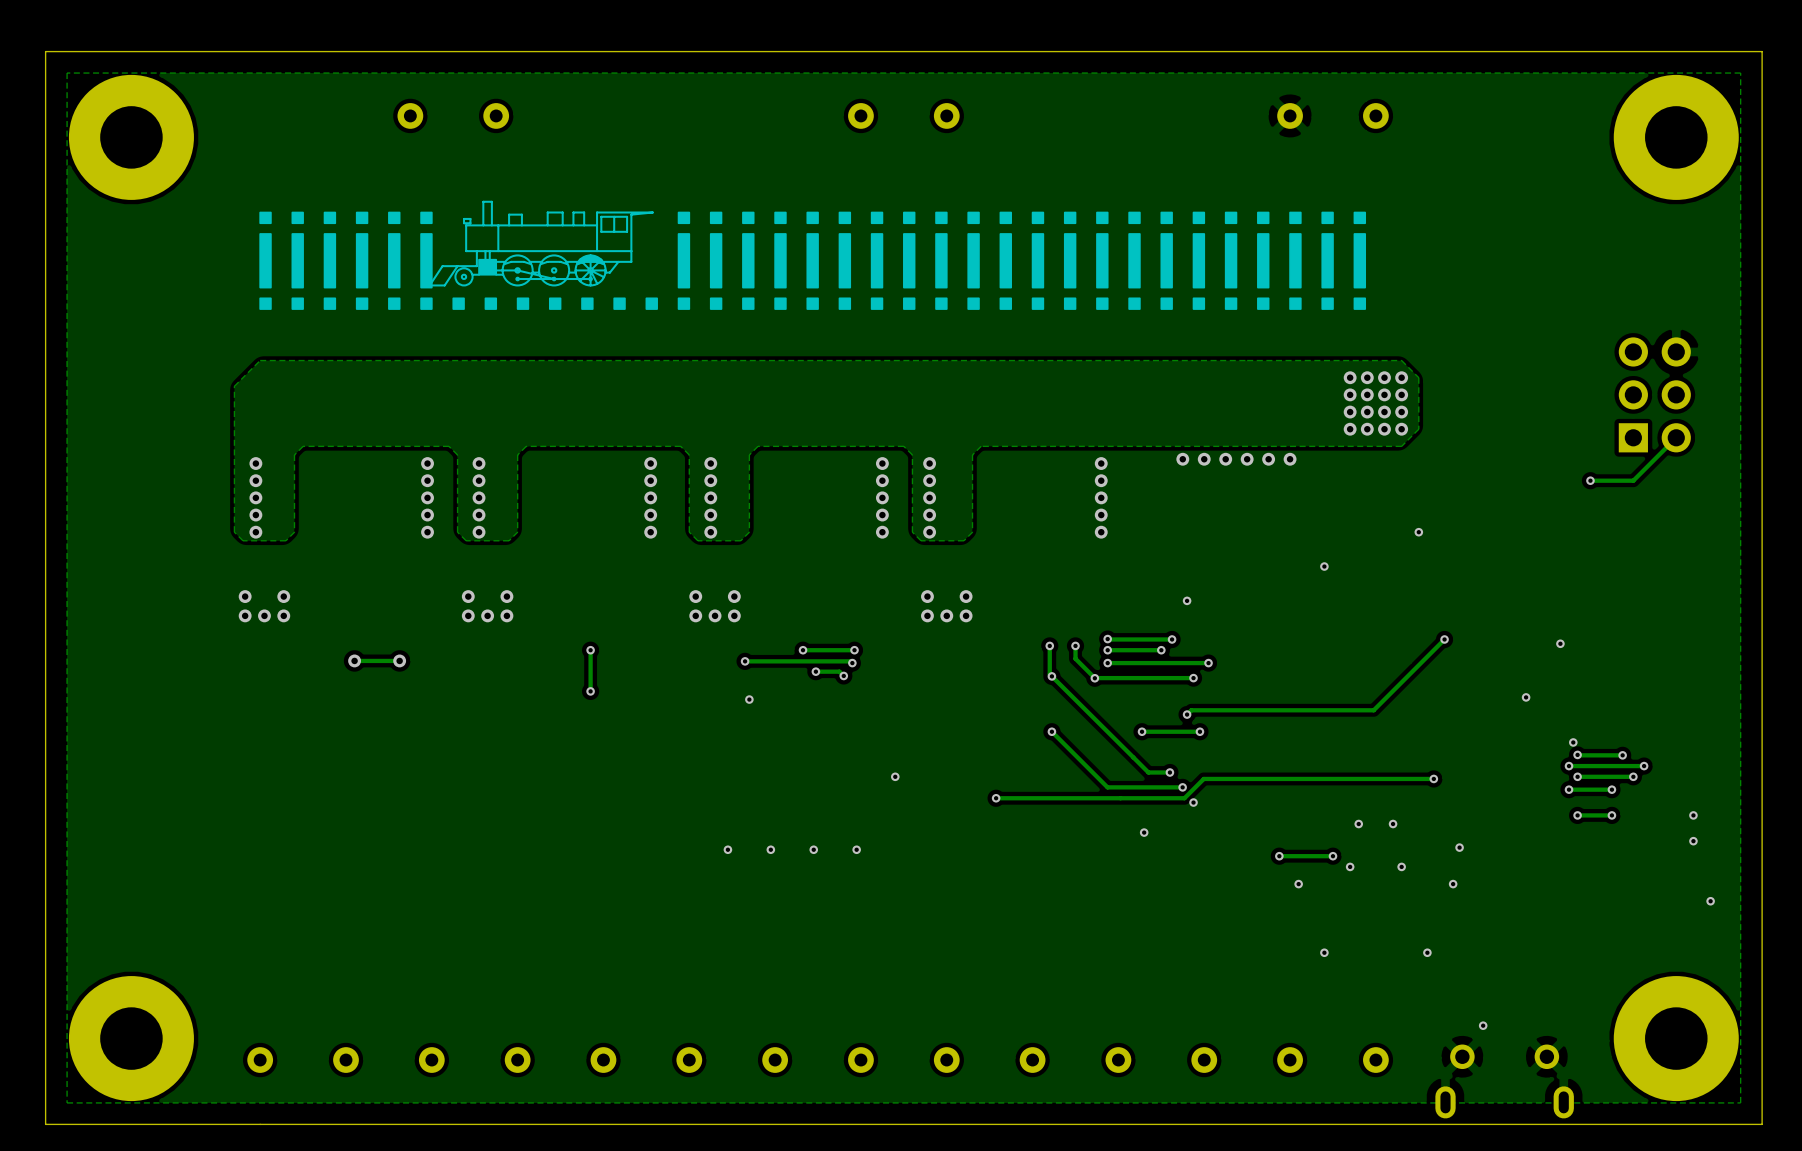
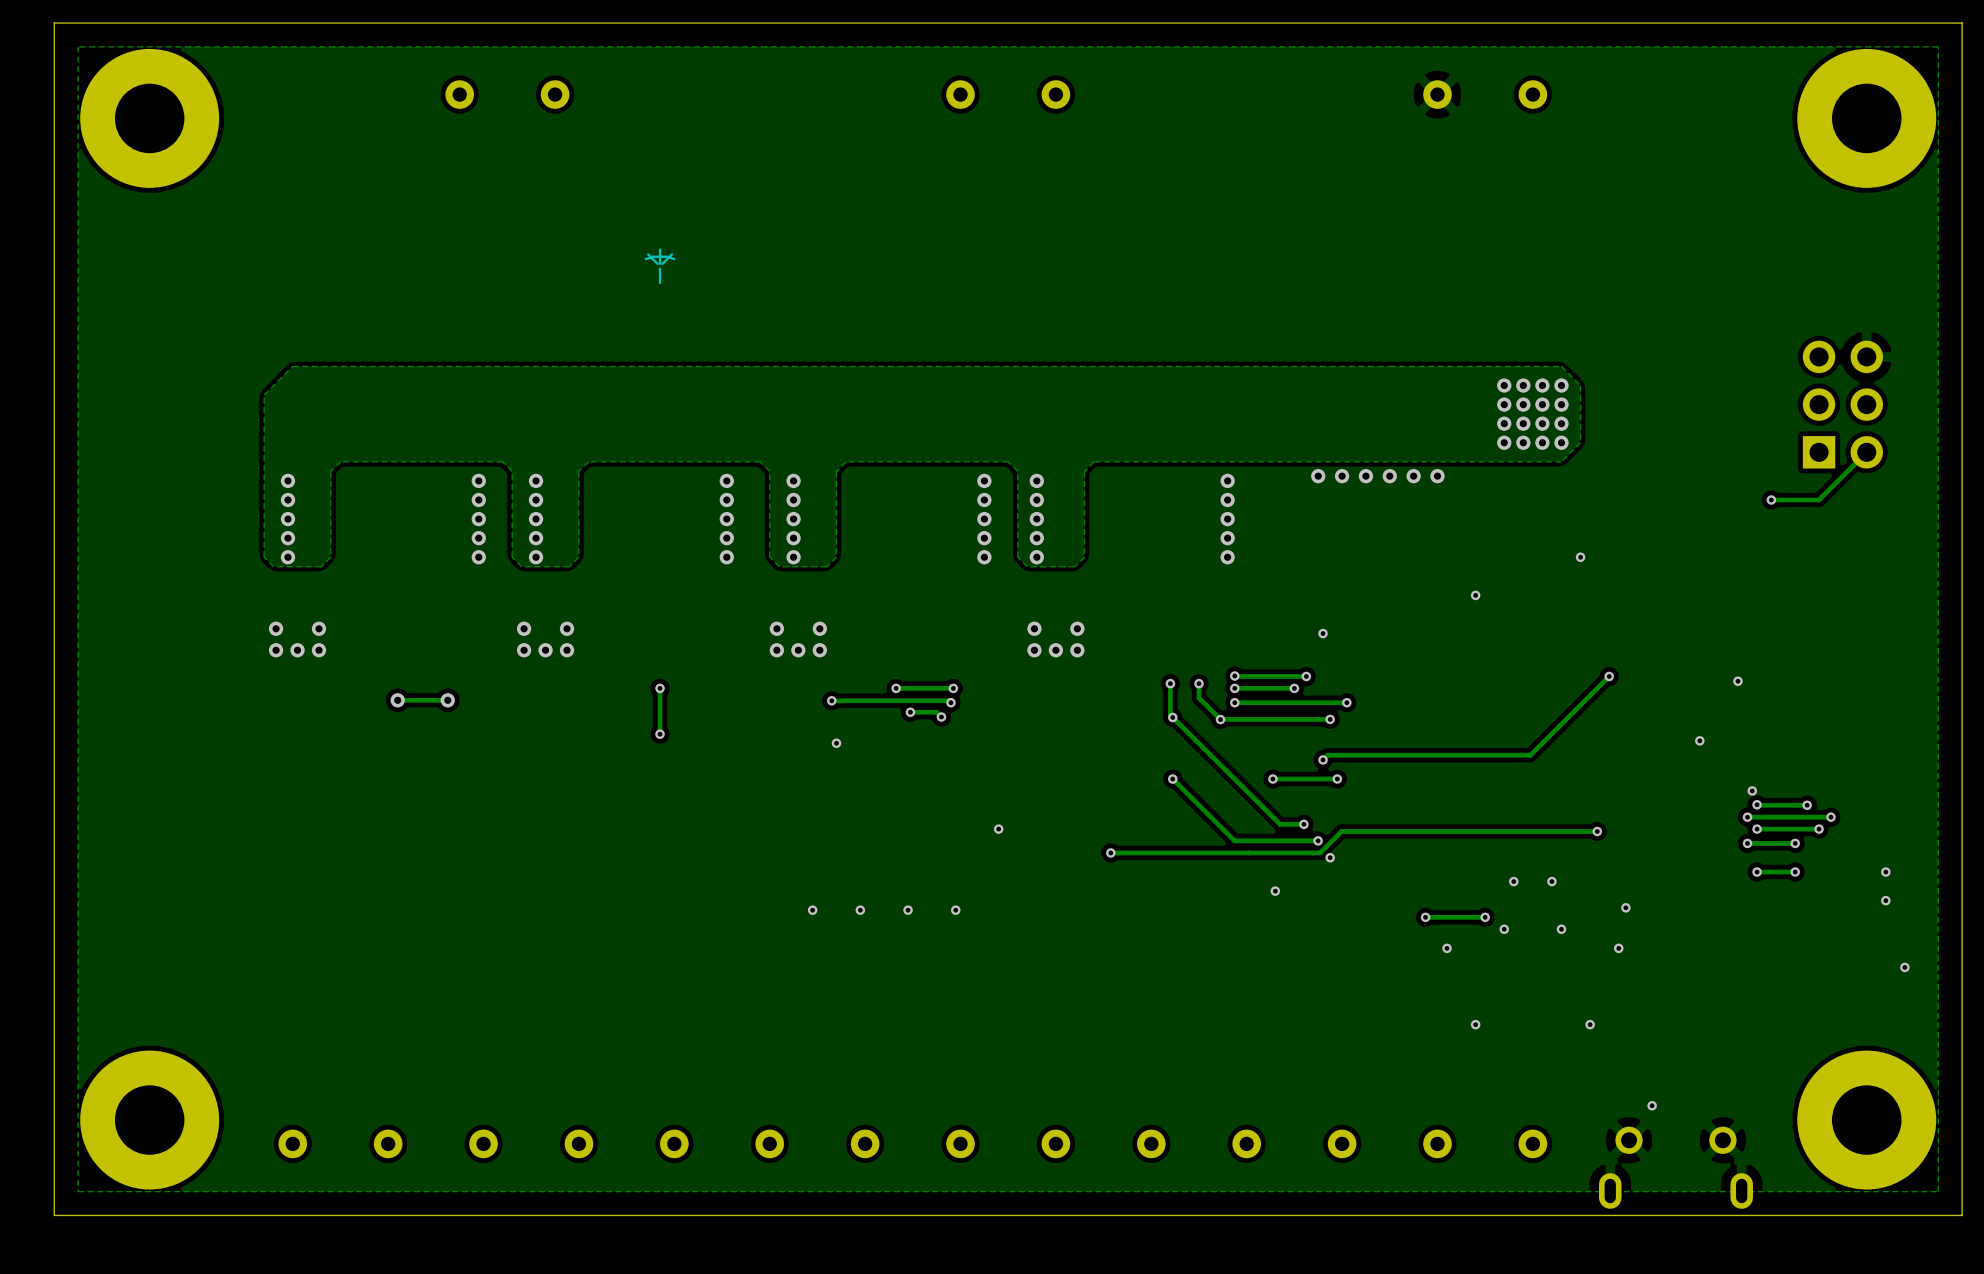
drawing: [259, 211, 1367, 310] -> none
line: (614, 216) (614, 231) -> none
line: (627, 216) (627, 231) (601, 231) (601, 216) (627, 216) -> none
line: (470, 218) (470, 223) (464, 223) (464, 218) (470, 218) -> none
line: (491, 225) (491, 201) (483, 201) (483, 225) -> none
line: (498, 225) (498, 251) -> none
line: (521, 225) (521, 214) (509, 214) (509, 225) -> none
line: (562, 225) (562, 212) (547, 212) (547, 225) -> none
line: (584, 225) (584, 212) (573, 212) (573, 225) -> none
line: (597, 225) (466, 225) (466, 251) (631, 251) -> none
line: (476, 251) (476, 266) (442, 266) (429, 285) (444, 285) (457, 266) -> none
line: (485, 251) (485, 259) -> none
line: (489, 251) (489, 259) -> none
line: (597, 251) (597, 212) (652, 212) (631, 214) (631, 261) (603, 261) -> none
line: (504, 261) (496, 261) -> none
line: (541, 261) (530, 261) -> none
line: (577, 261) (567, 261) -> none
line: (618, 261) (609, 272) (605, 272) -> none
line: (530, 264) (524, 261) (504, 264) -> none
line: (567, 264) (560, 261) (541, 264) -> none
line: (496, 270) (517, 270) (554, 279) -> none
line: (588, 270) (575, 270) -> none
line: (605, 270) (592, 270) -> none
line: (539, 272) (532, 272) -> none
line: (575, 272) (569, 272) -> none
line: (588, 272) (579, 281) -> none
line: (479, 274) (472, 274) -> none
line: (502, 274) (496, 274) -> none
line: (603, 276) (590, 270) (597, 283) -> none
line: (590, 279) (517, 279) -> none

